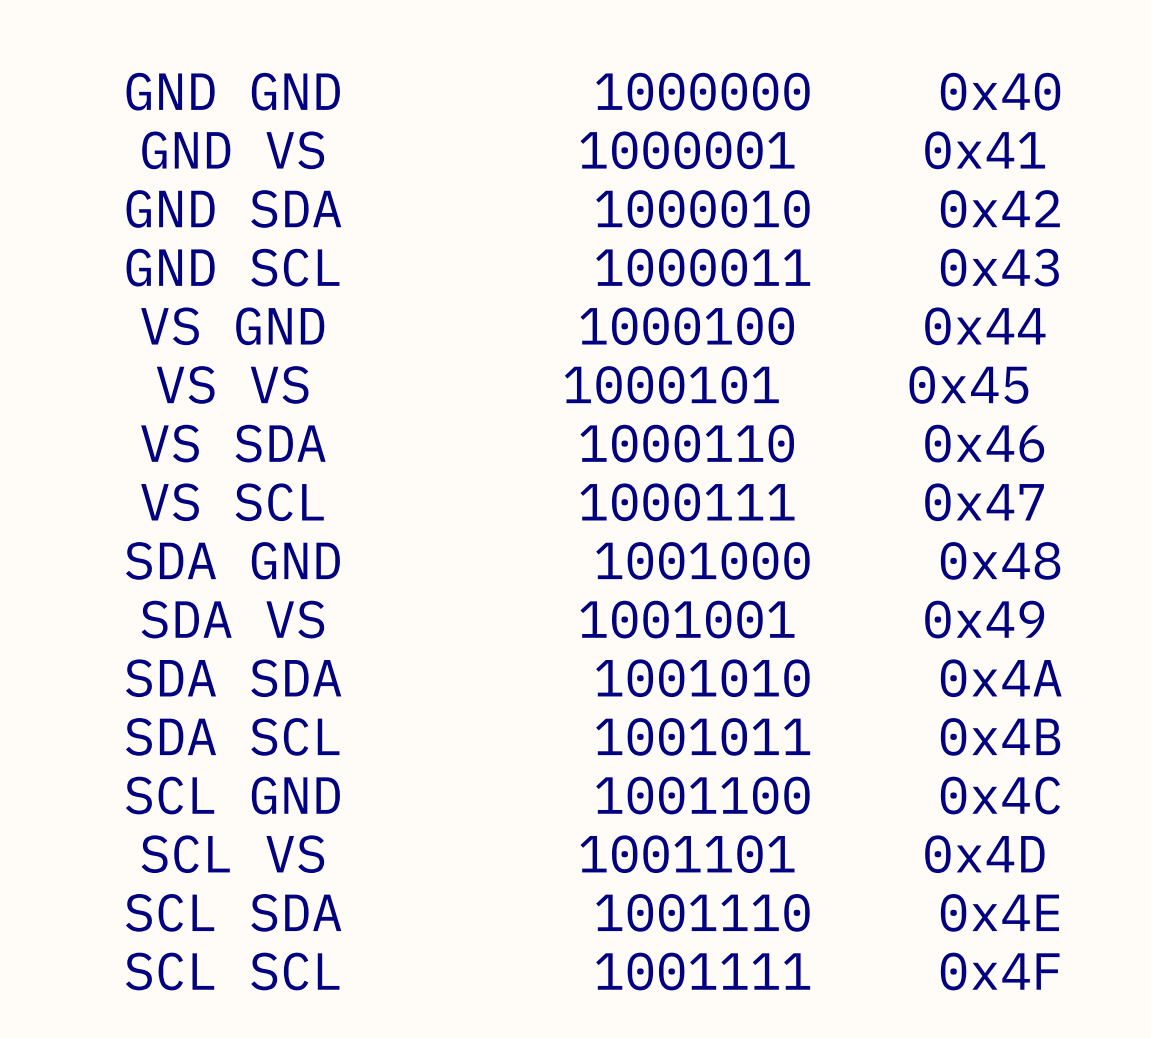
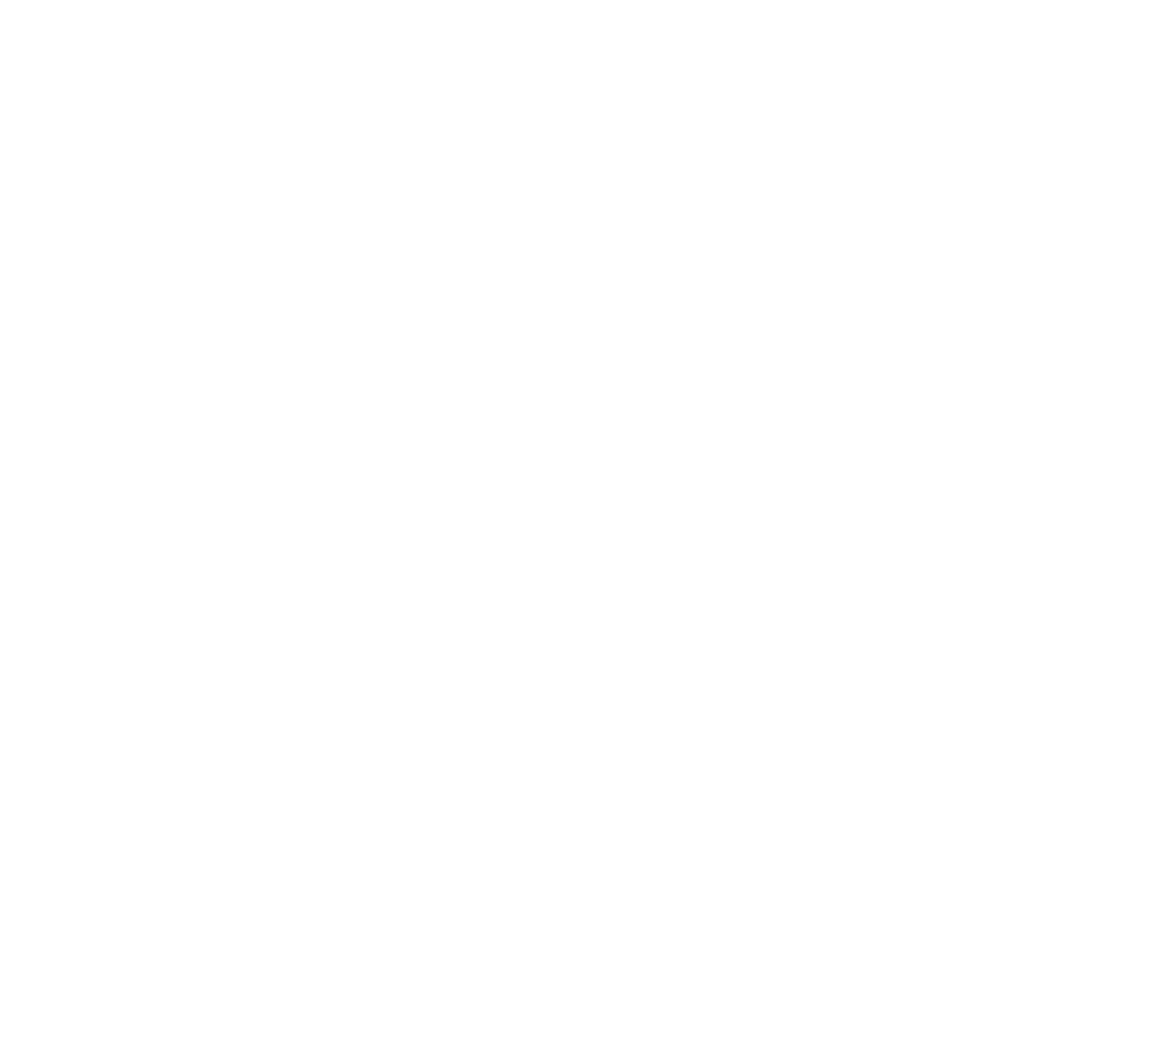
text: GND GND 1000000 0x40 (593, 91) -> none
text: GND VS 1000001 0x41 (593, 150) -> none
text: GND SDA 1000010 0x42 (593, 208) -> none
text: GND SCL 1000011 0x43 (592, 267) -> none
text: VS GND 1000100 0x44 (593, 326) -> none
text: VS VS 1000101 0x45 (592, 384) -> none
text: VS SDA 1000110 0x46 (592, 443) -> none
text: VS SCL 1000111 0x47 (592, 502) -> none
text: SDA GND 1001000 0x48 (593, 560) -> none
text: SDA VS 1001001 0x49 (592, 619) -> none
text: SDA SDA 1001010 0x4A (593, 678) -> none
text: SDA SCL 1001011 0x4B (593, 736) -> none
text: SCL GND 1001100 0x4C (592, 795) -> none
text: SCL VS 1001101 0x4D (593, 854) -> none
text: SCL SDA 1001110 0x4E (592, 912) -> none
text: SCL SCL 1001111 0x4F (592, 971) -> none

